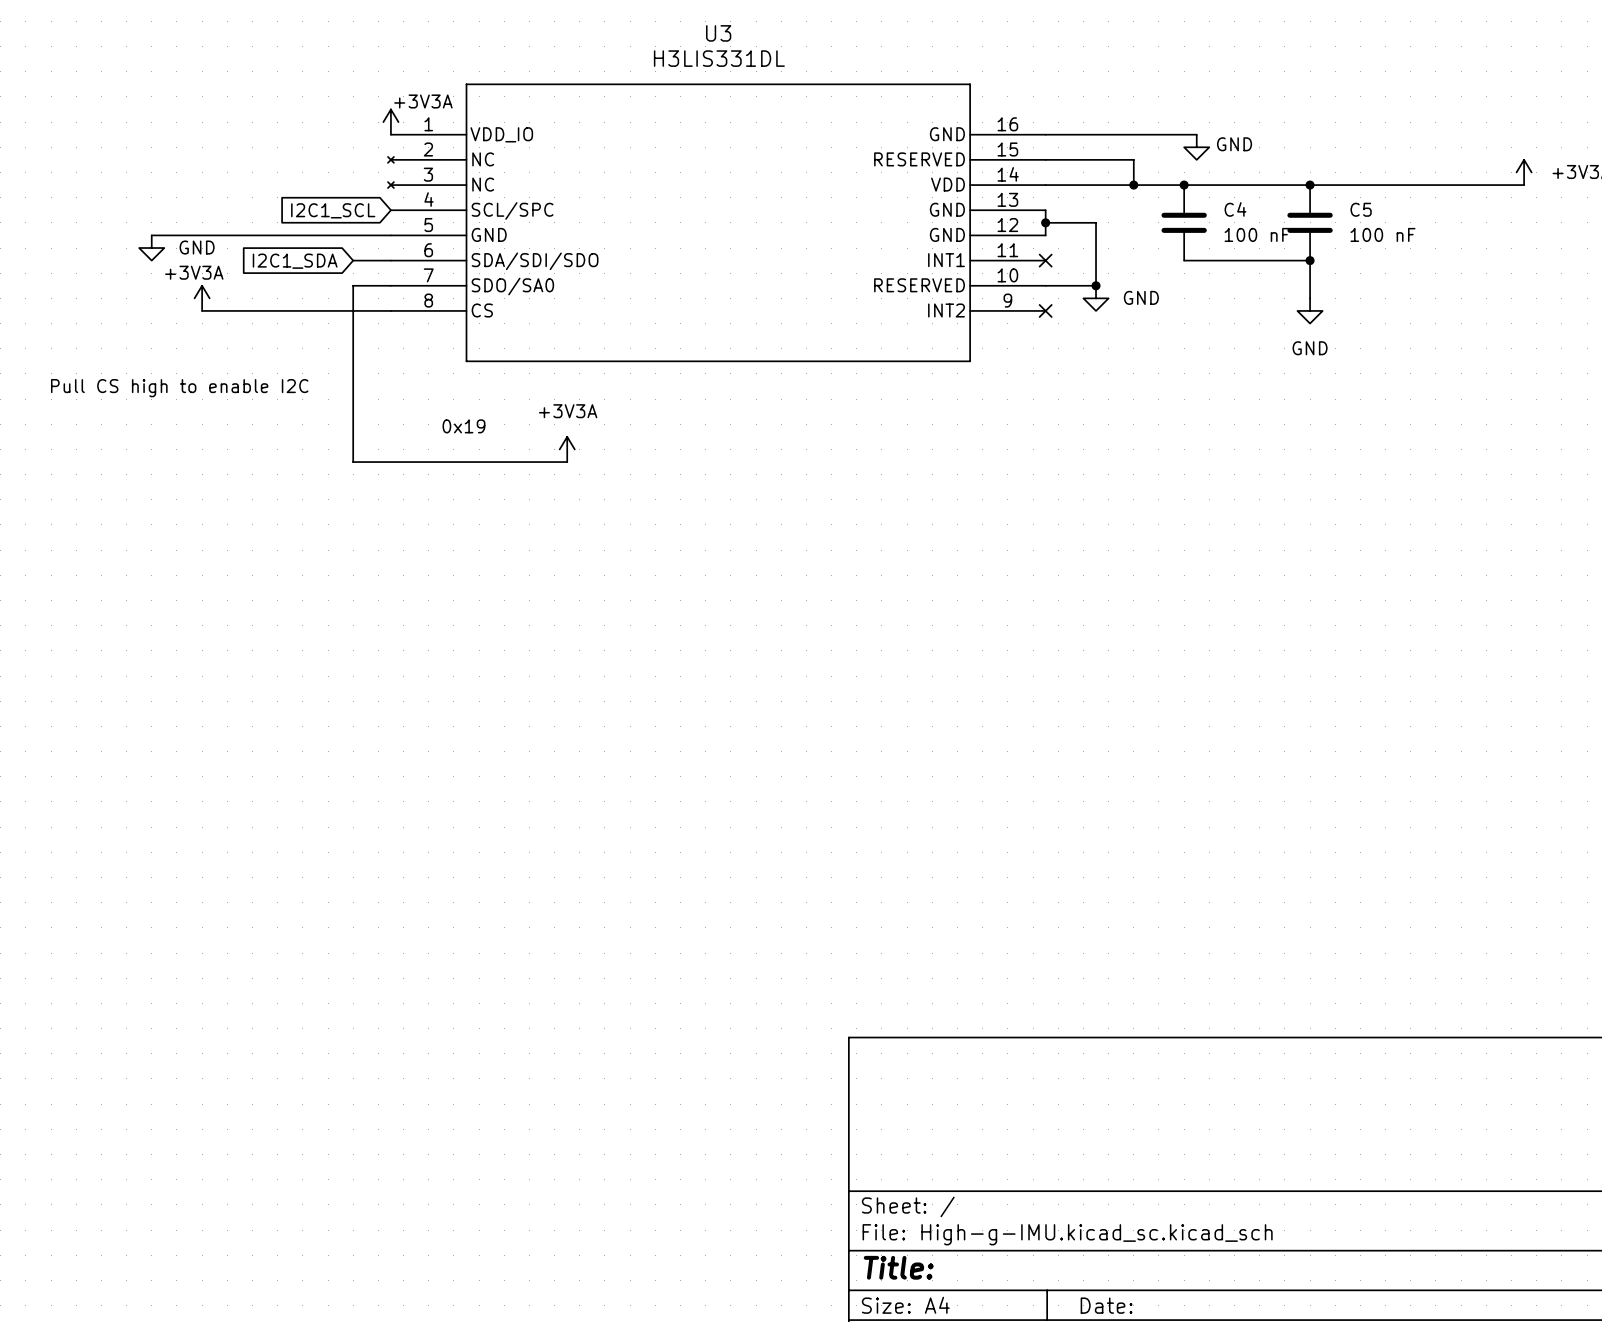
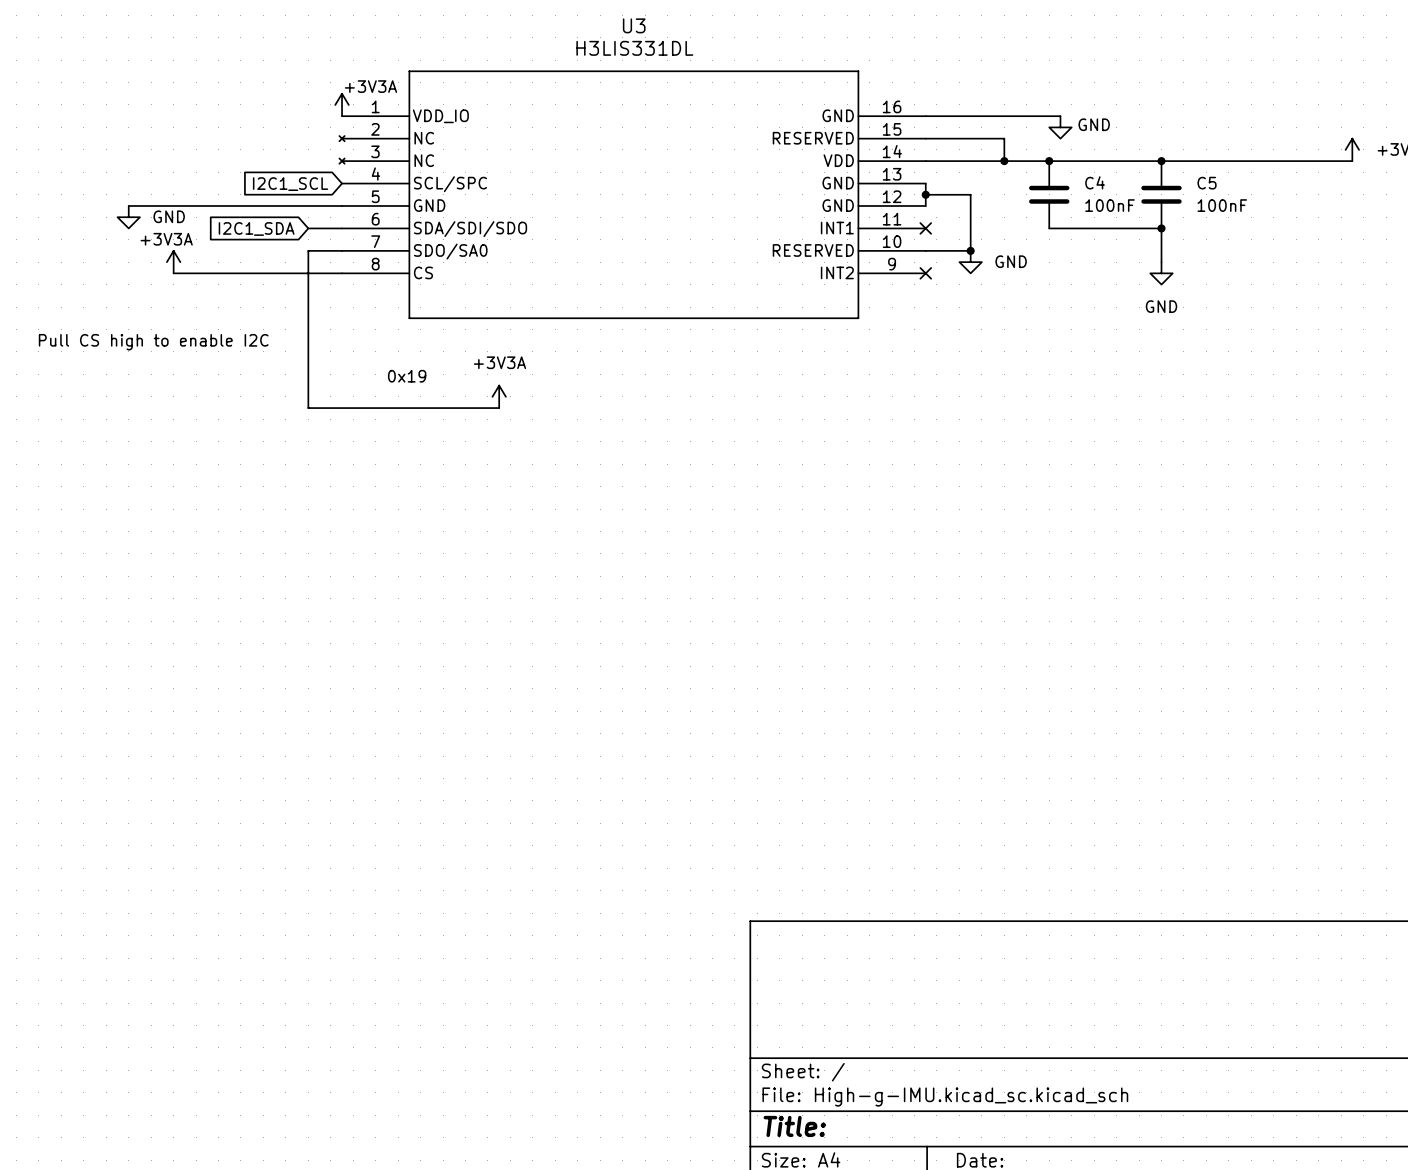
C4 value: 100 nF (1257, 234) -> 100nF (1110, 205)
C5 value: 100 nF (1382, 234) -> 100nF (1222, 205)

